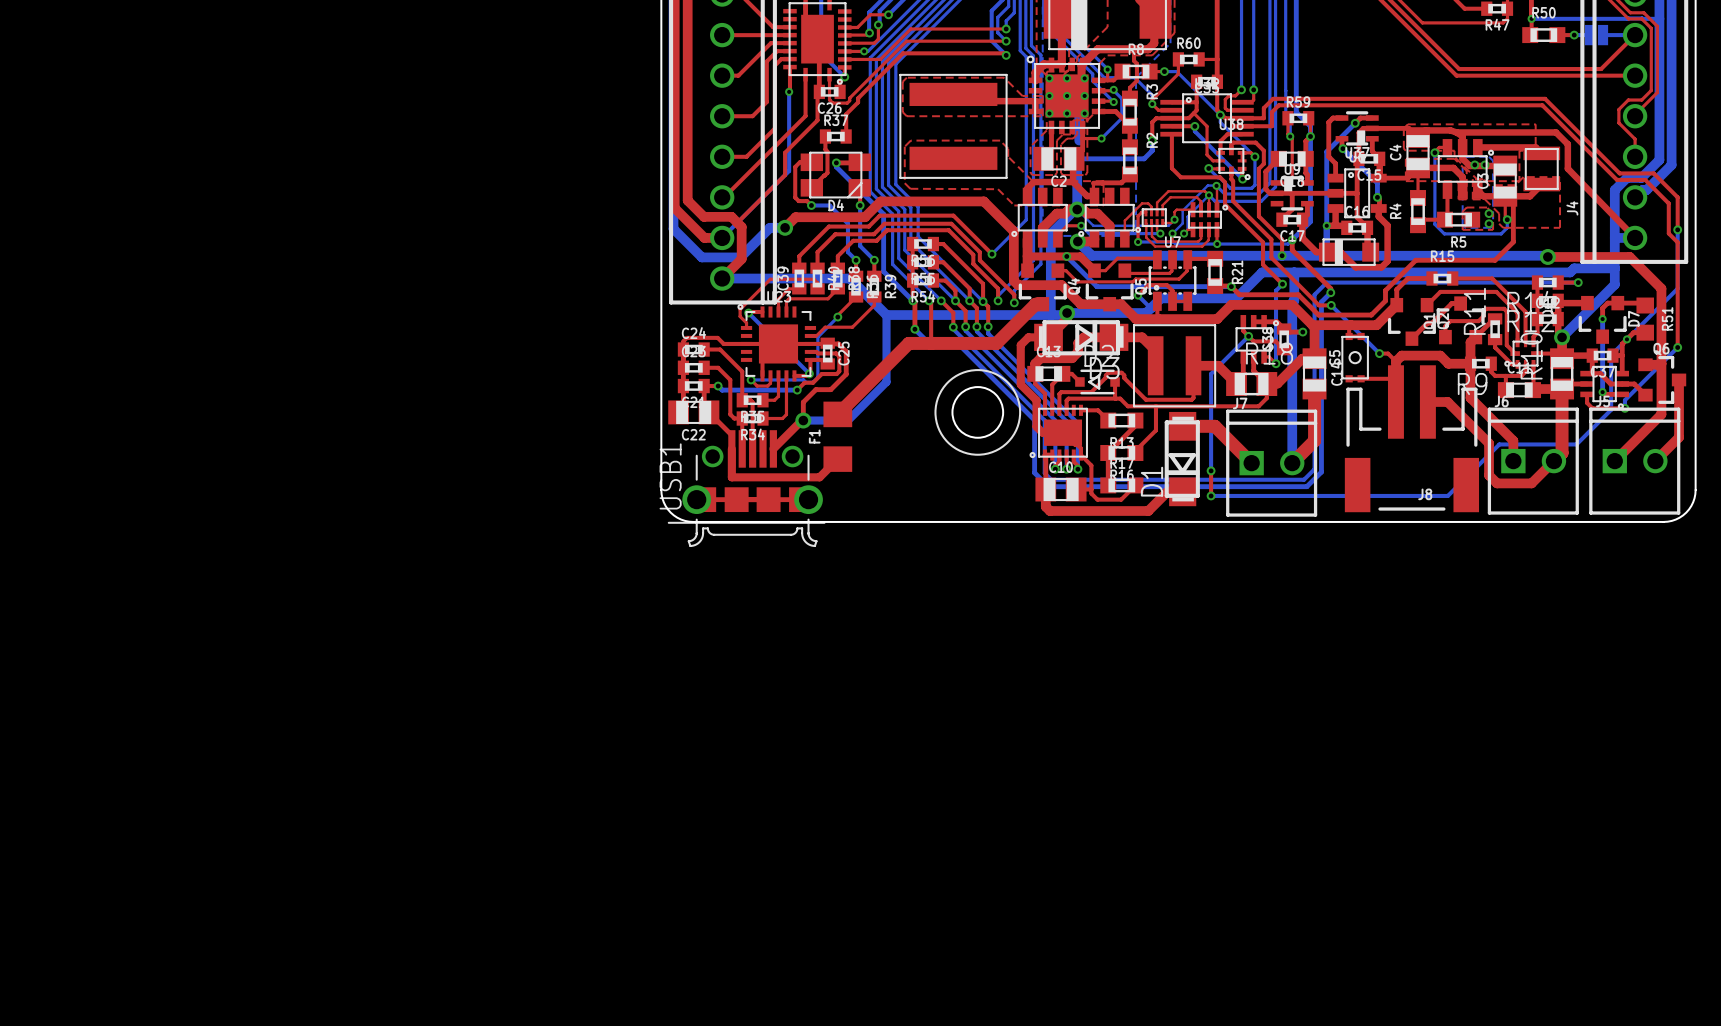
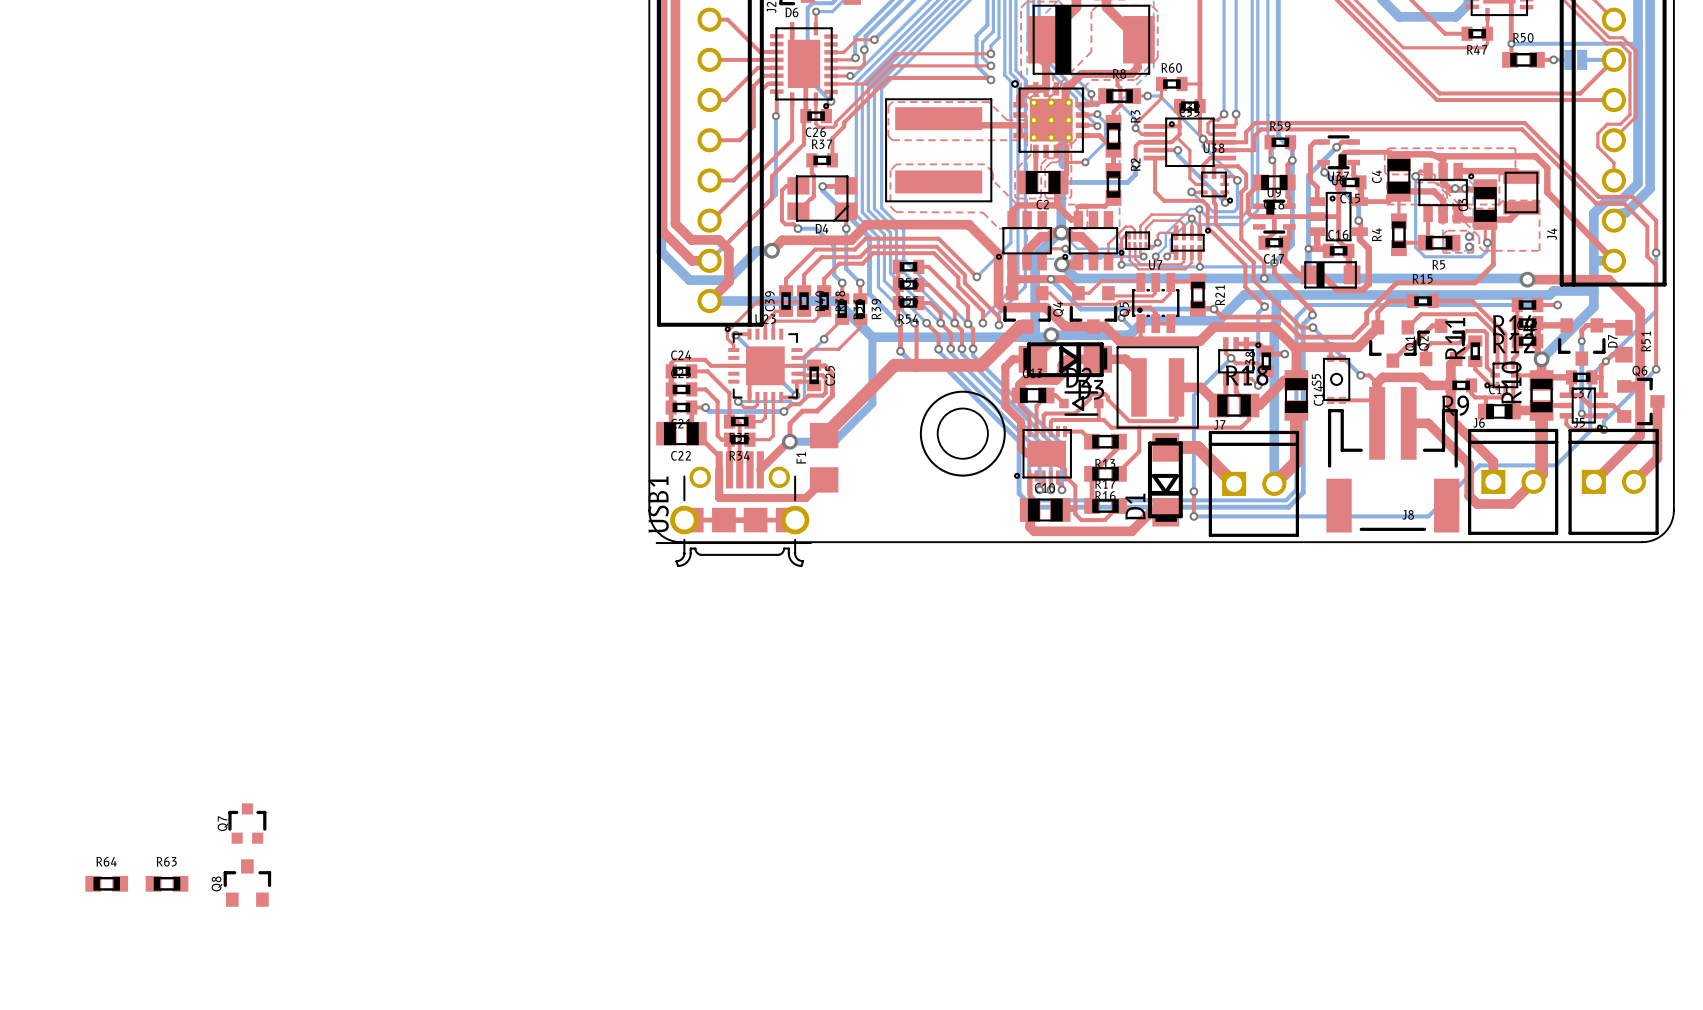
Q7: none -> (247, 823)
R64: none -> (106, 883)
R63: none -> (167, 883)
Q8: none -> (247, 883)

